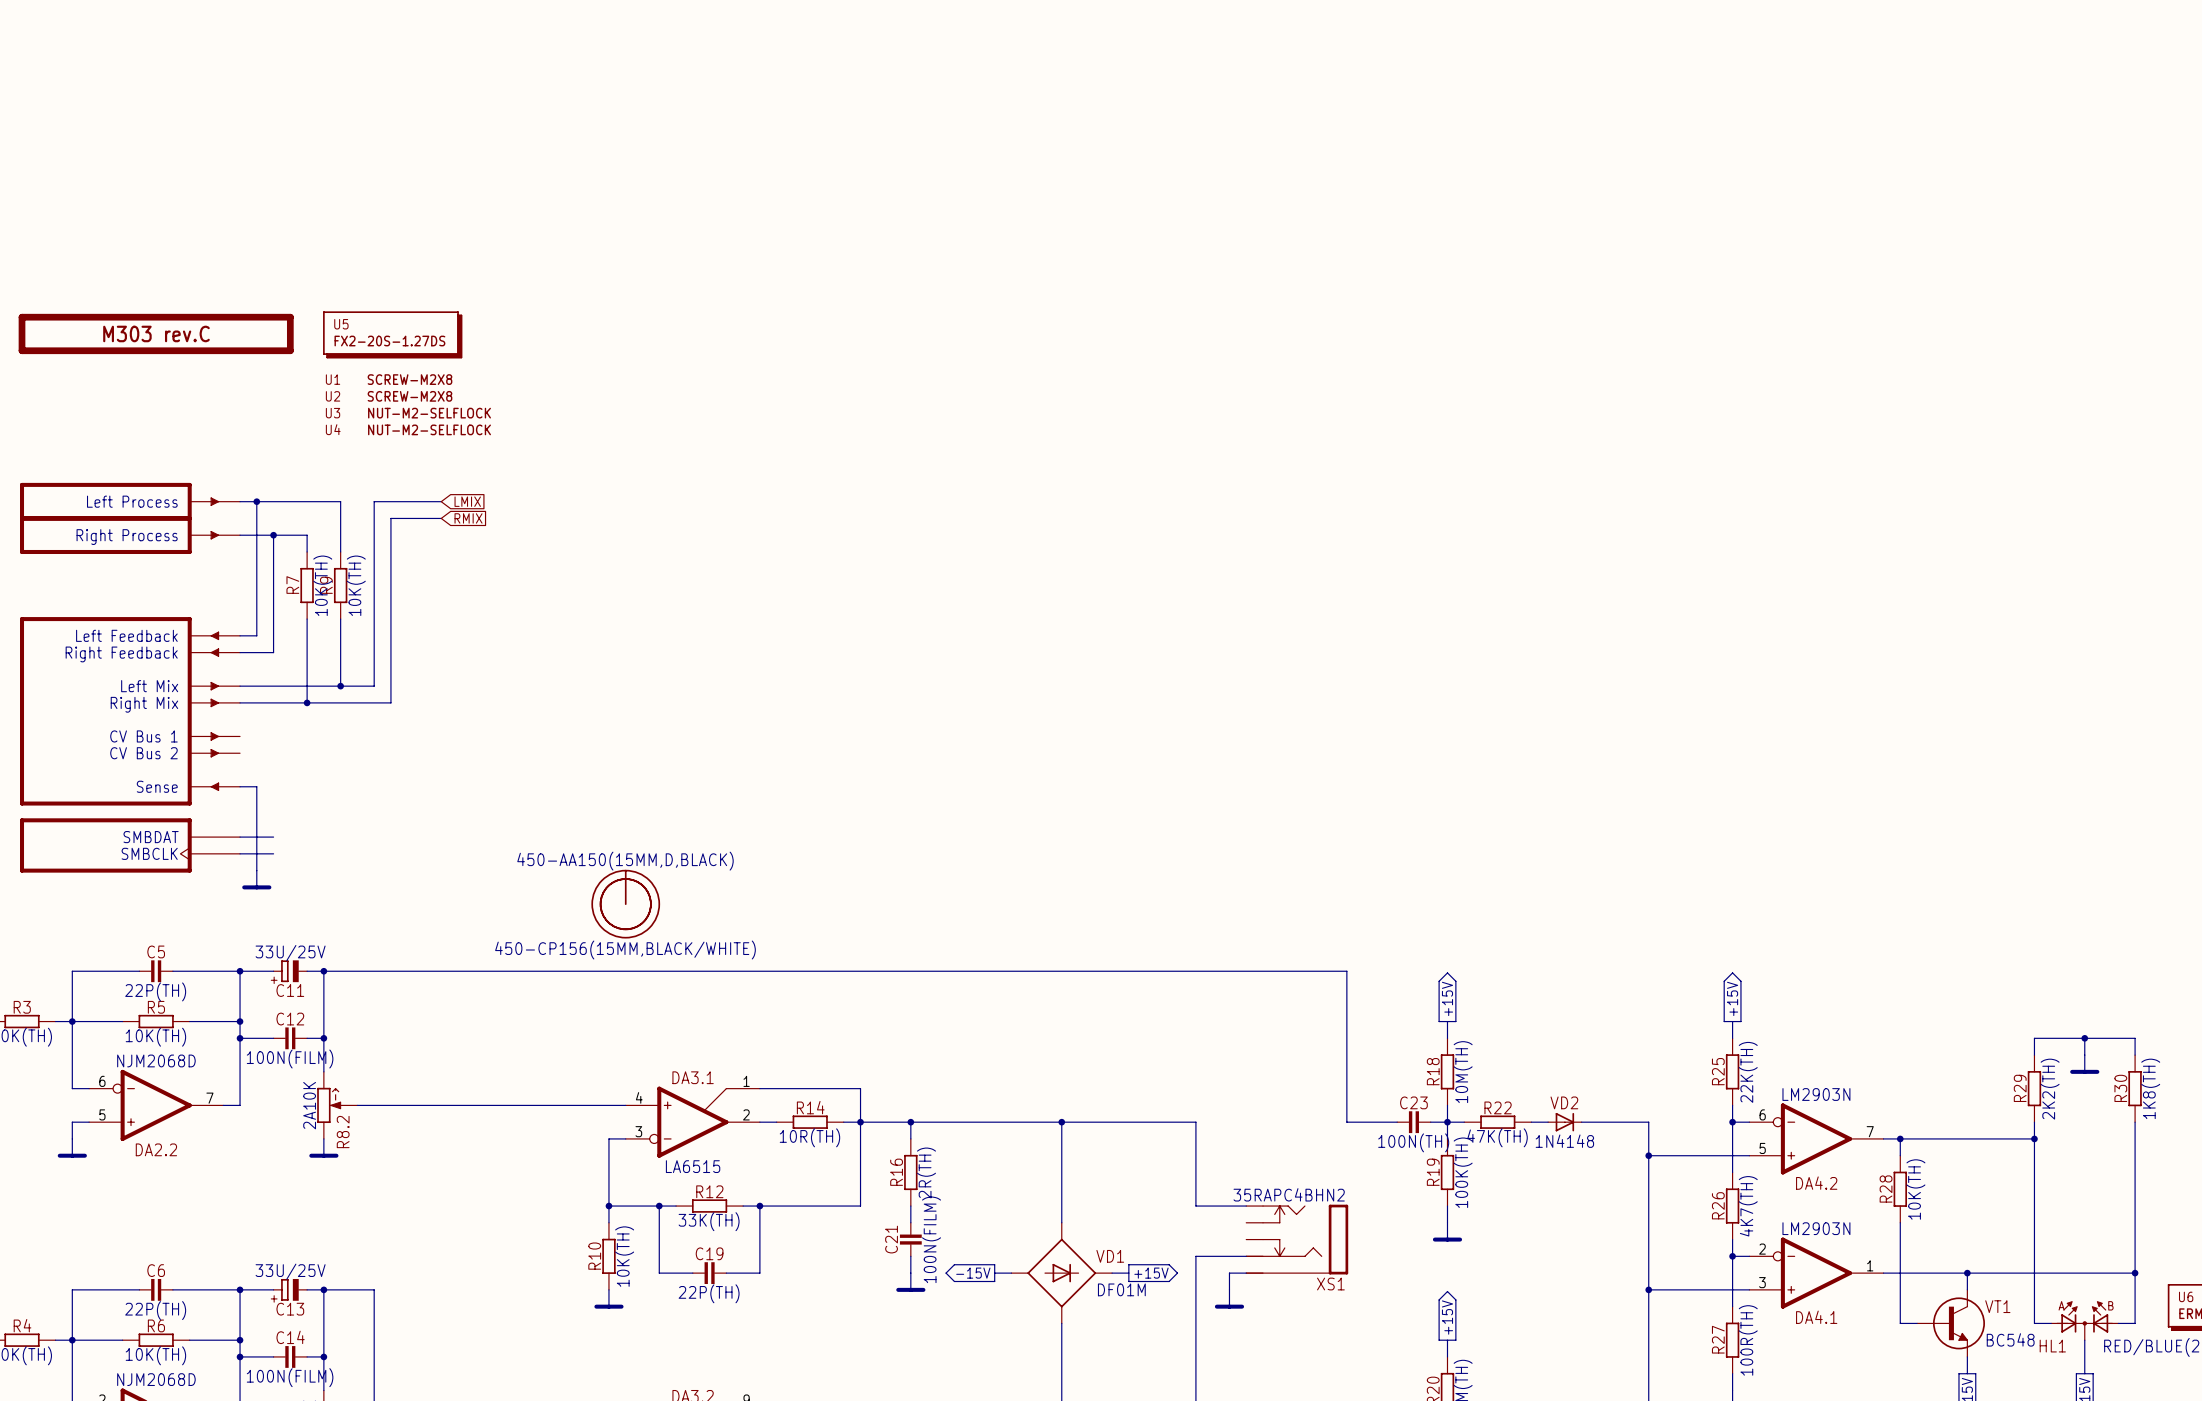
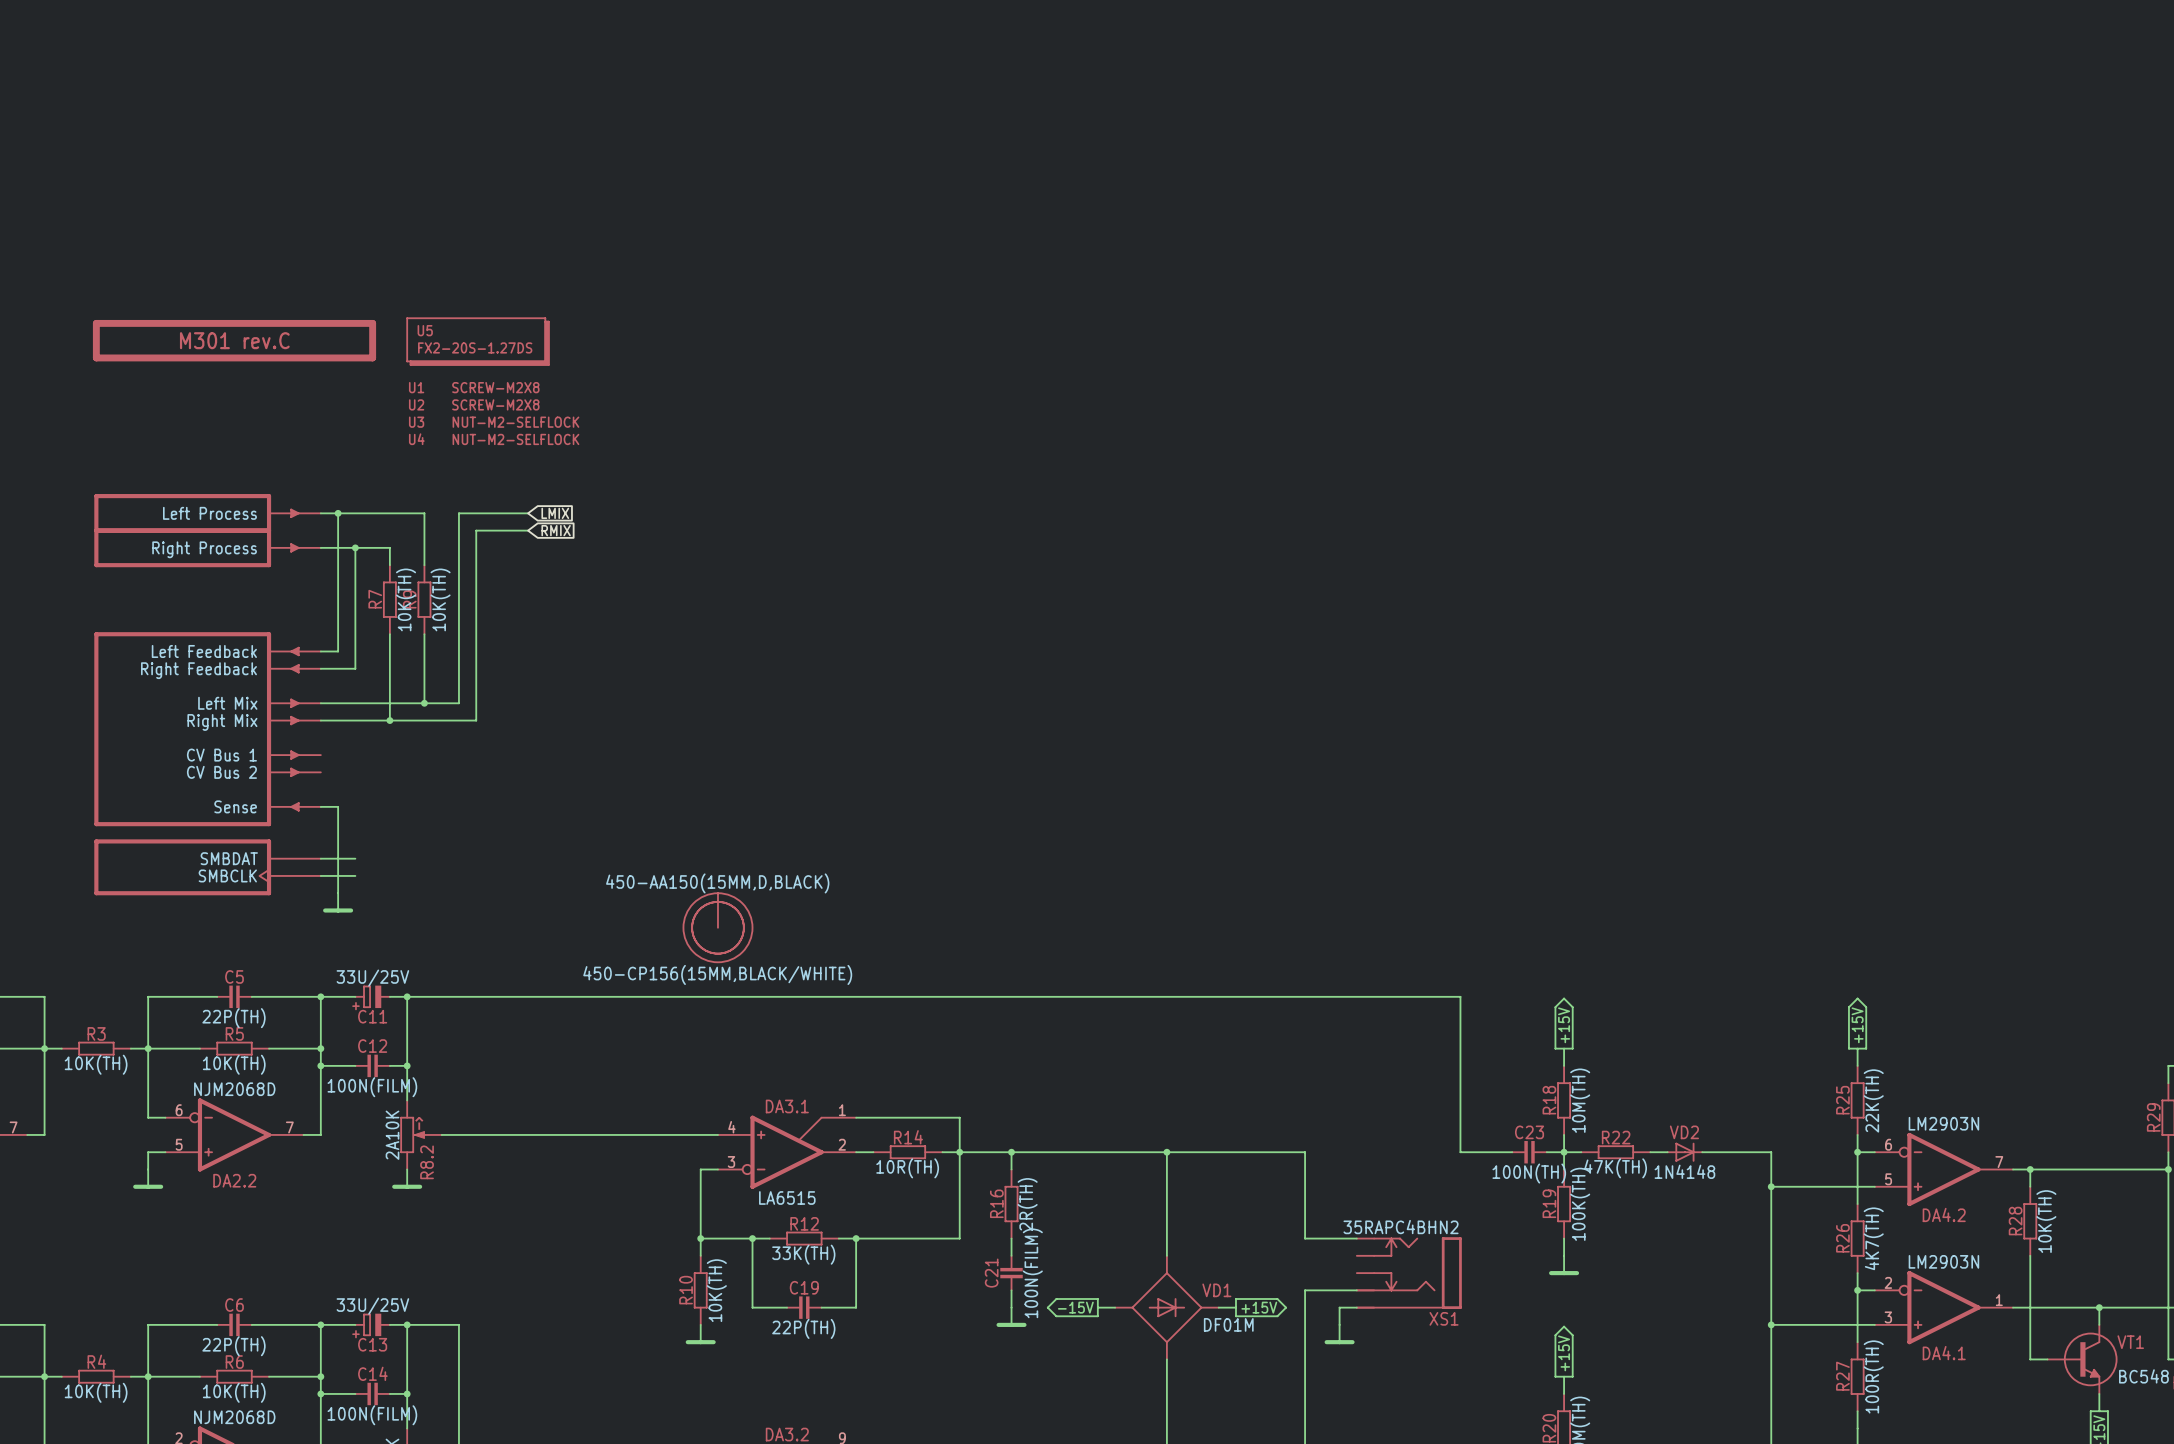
part value: M303 rev.C (156, 333) -> M301 rev.C (234, 340)

